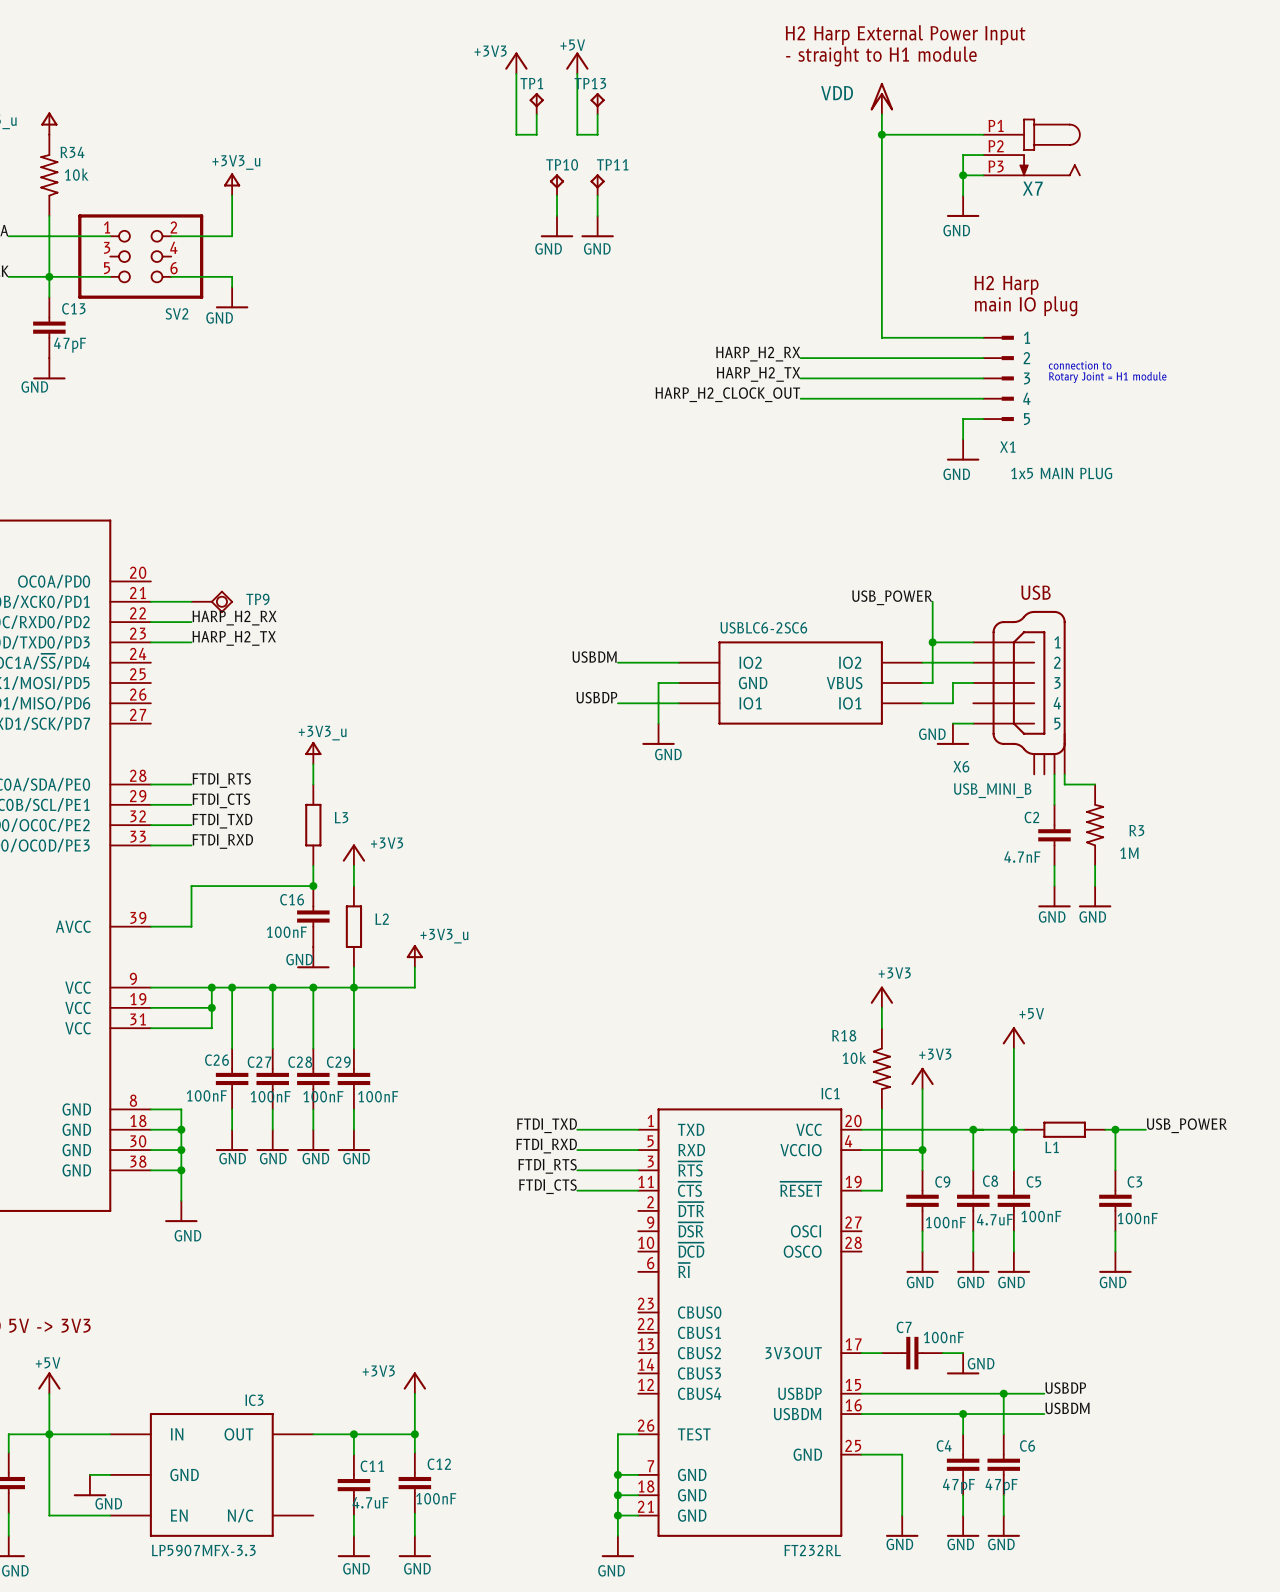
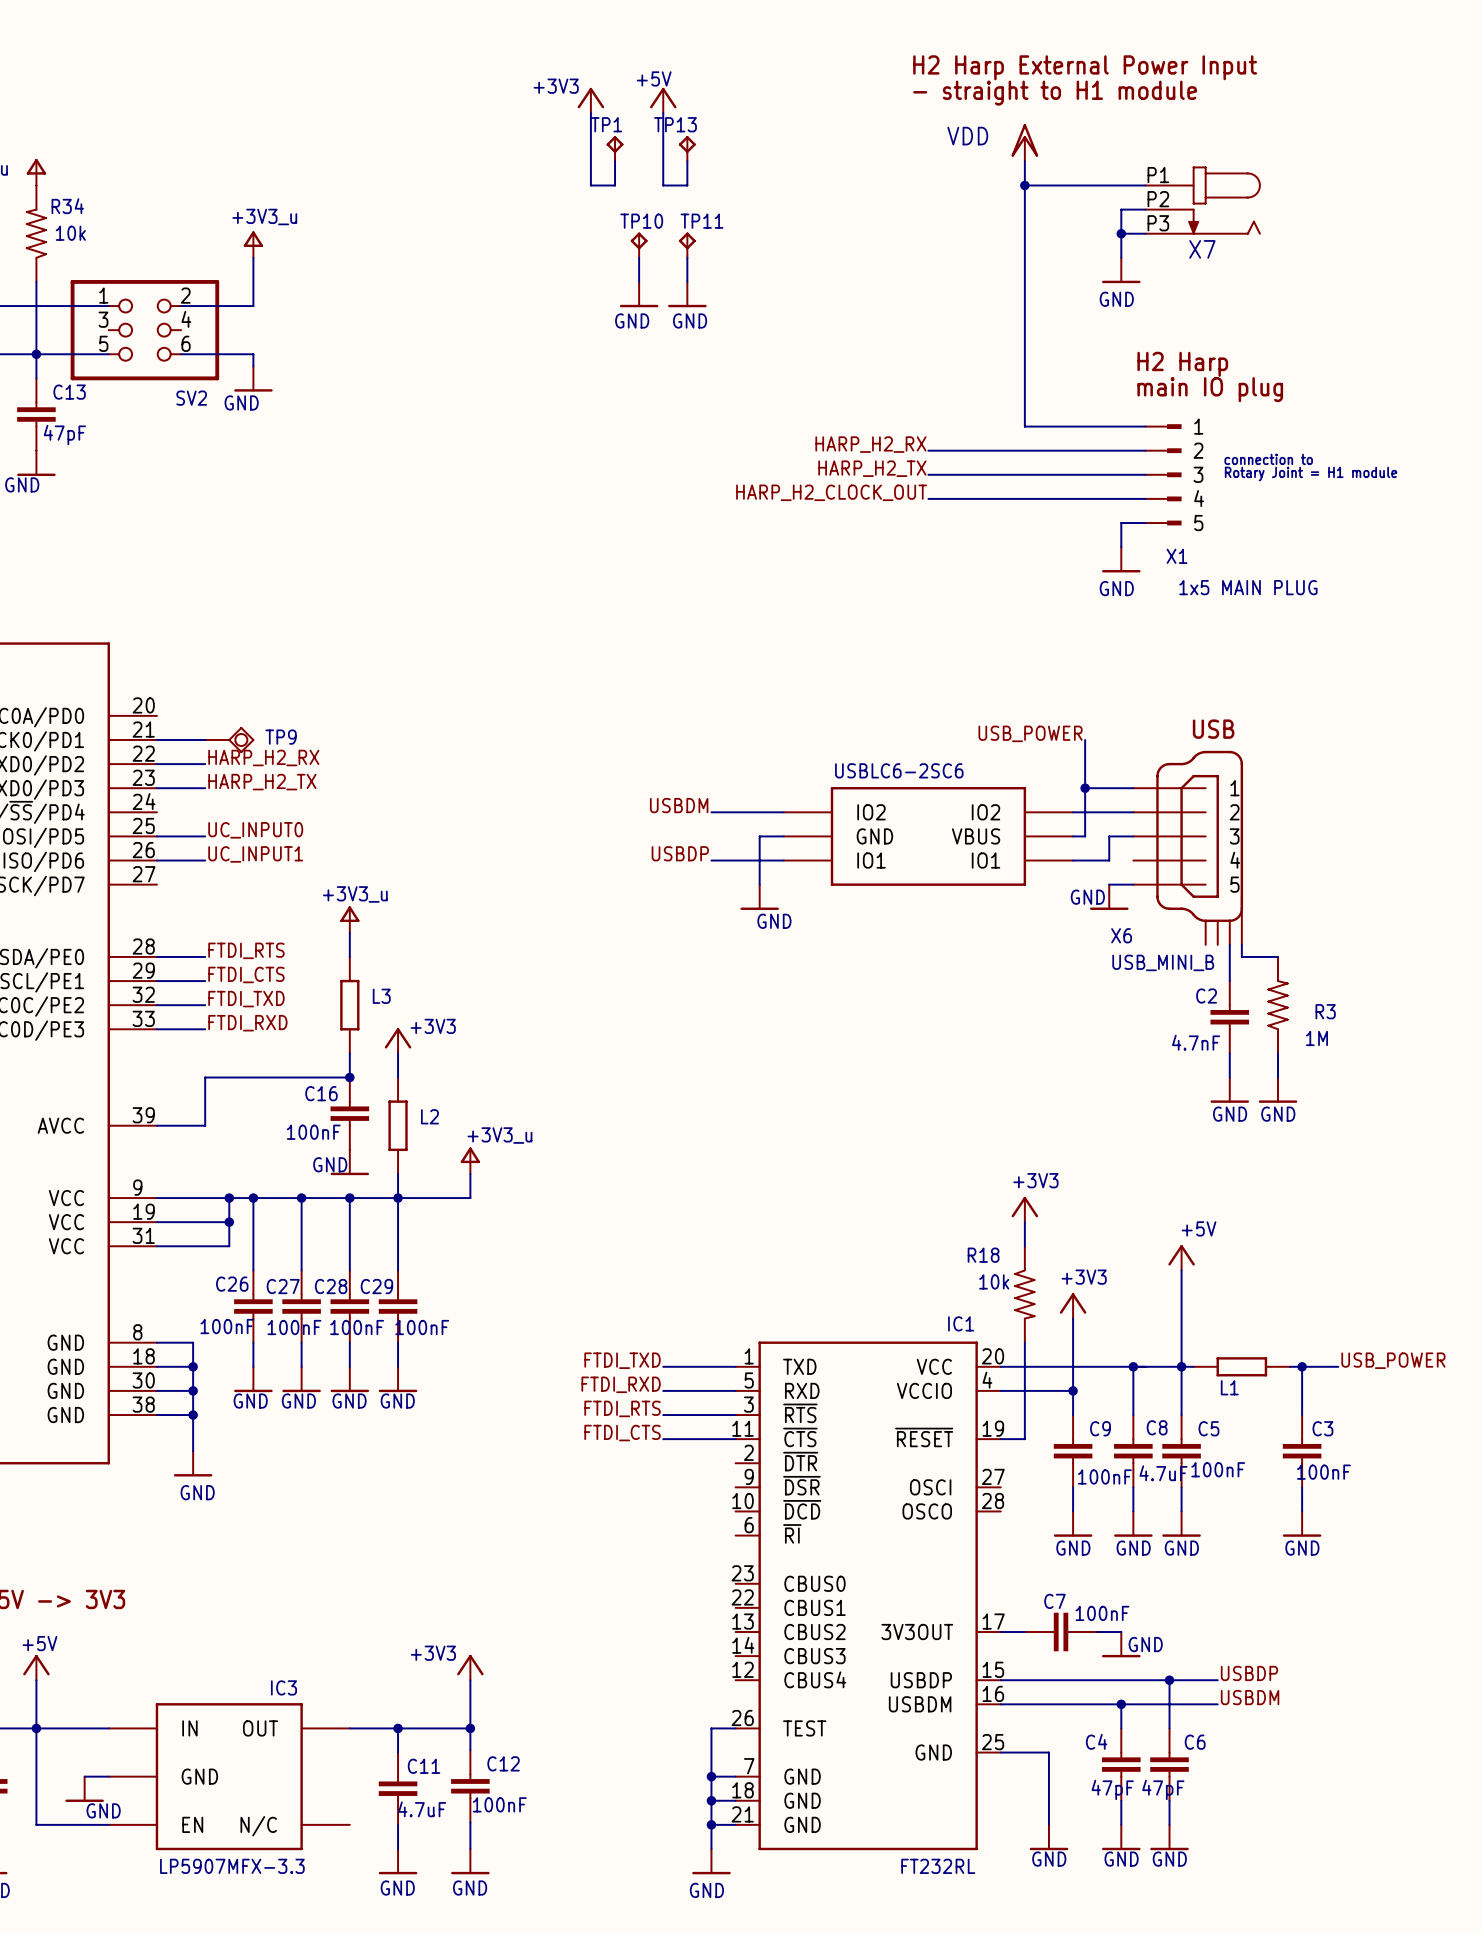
label: none -> UC_INPUT0 (255, 830)
wire: none -> (156, 836) (205, 836)
label: none -> UC_INPUT1 (255, 854)
wire: none -> (156, 860) (205, 860)

